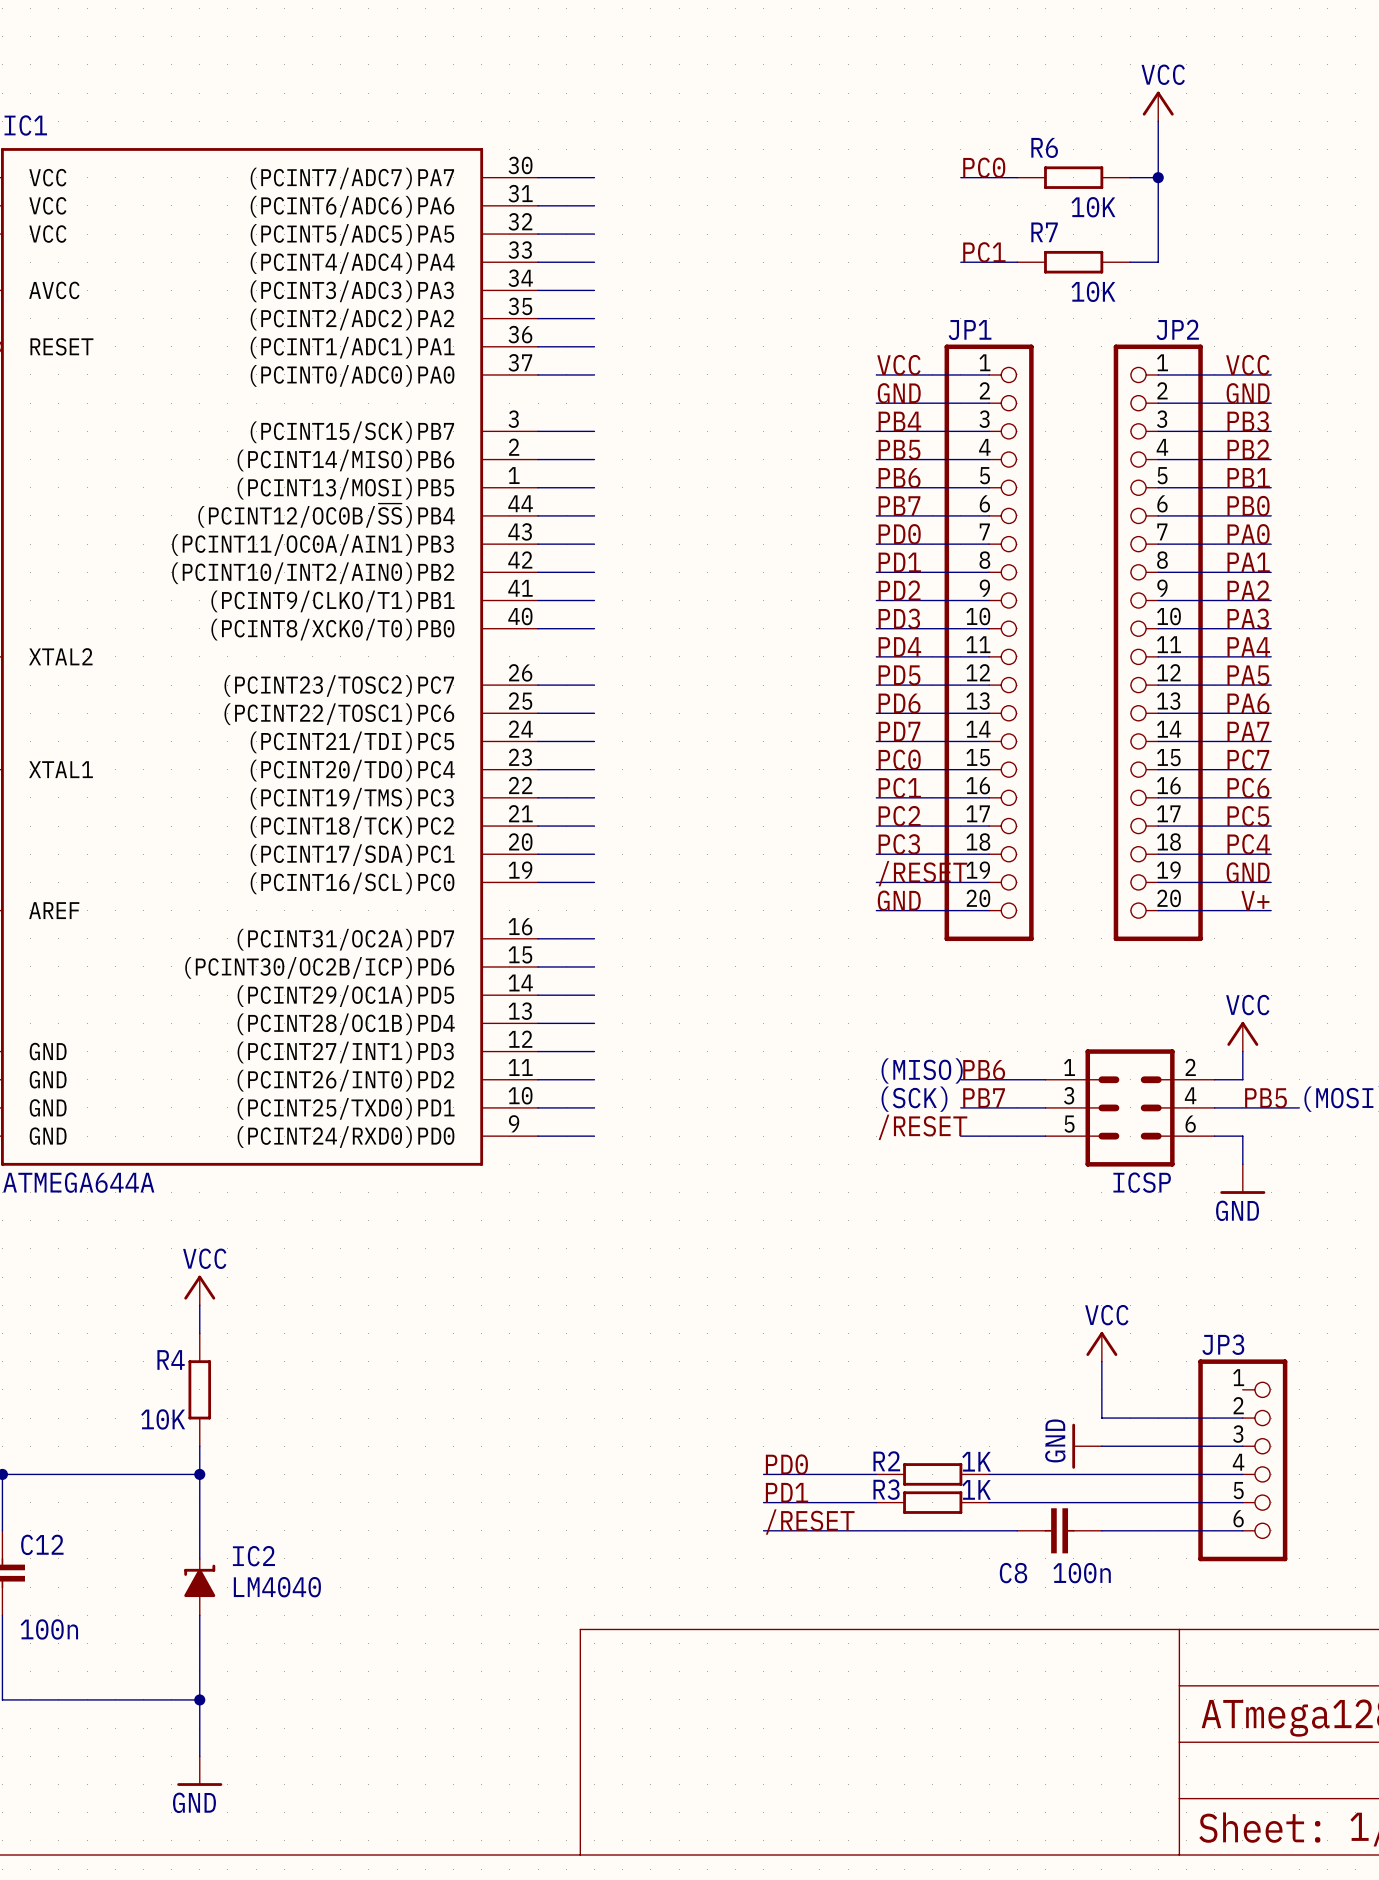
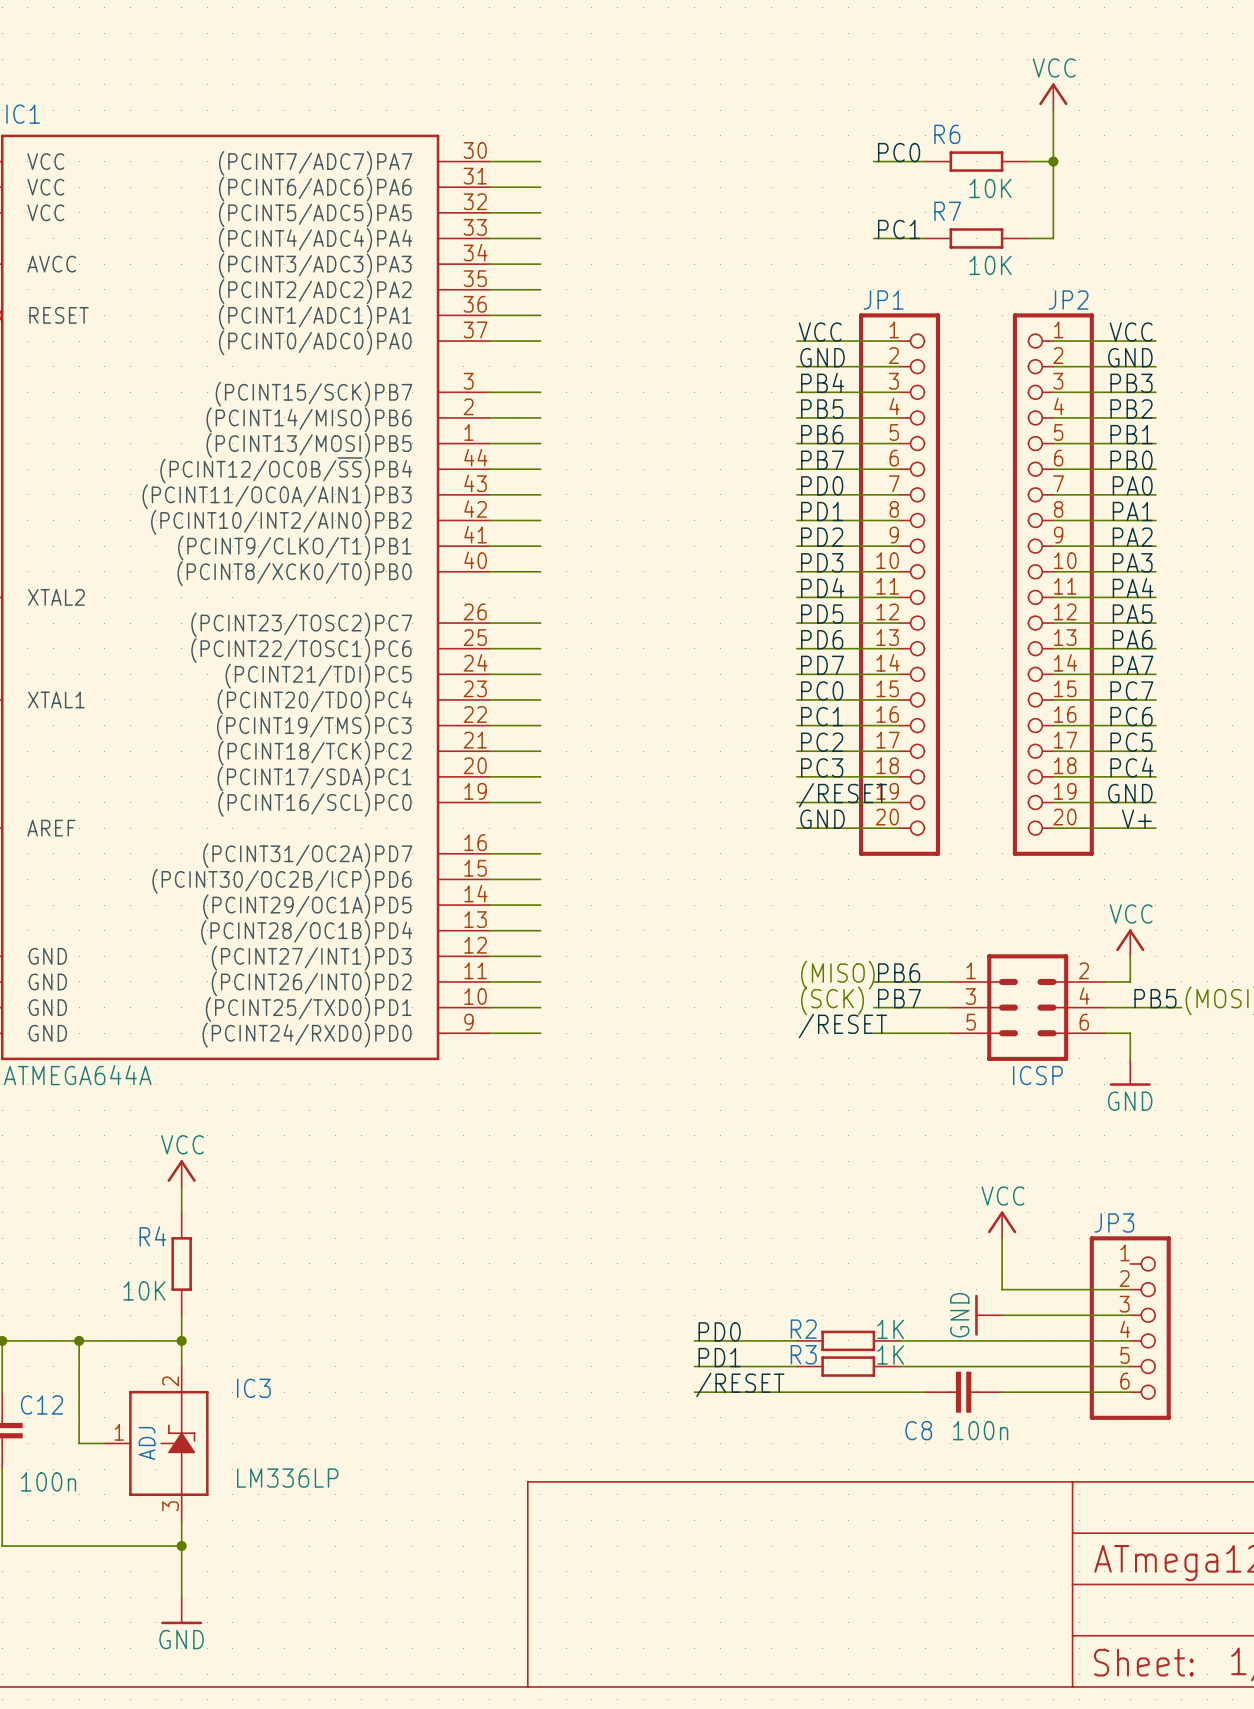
wire: none -> (79, 1340) (79, 1443) (104, 1443)
junction: none -> (79, 1340)
IC3: none -> LM336LP (156, 1443)
IC2: LM4040 (199, 1587) -> none

